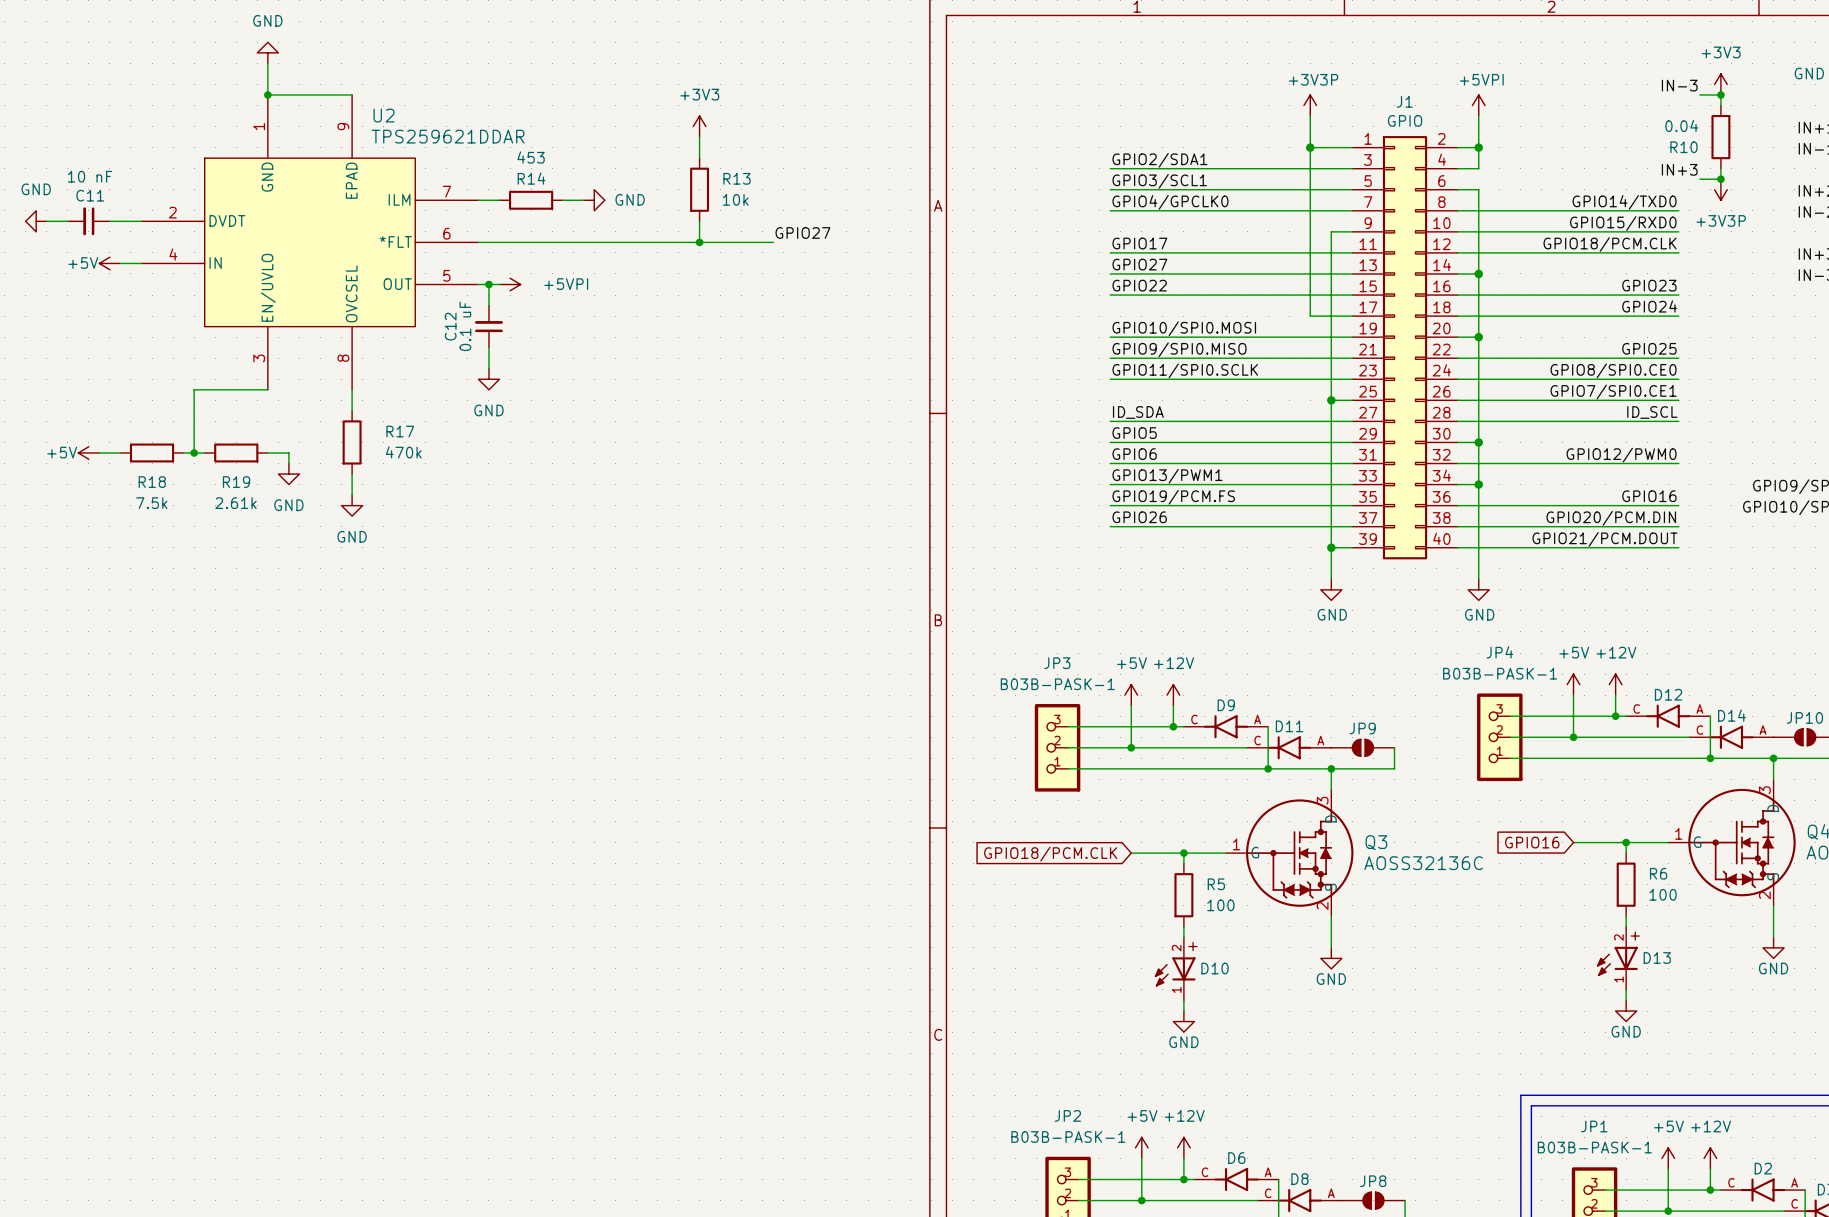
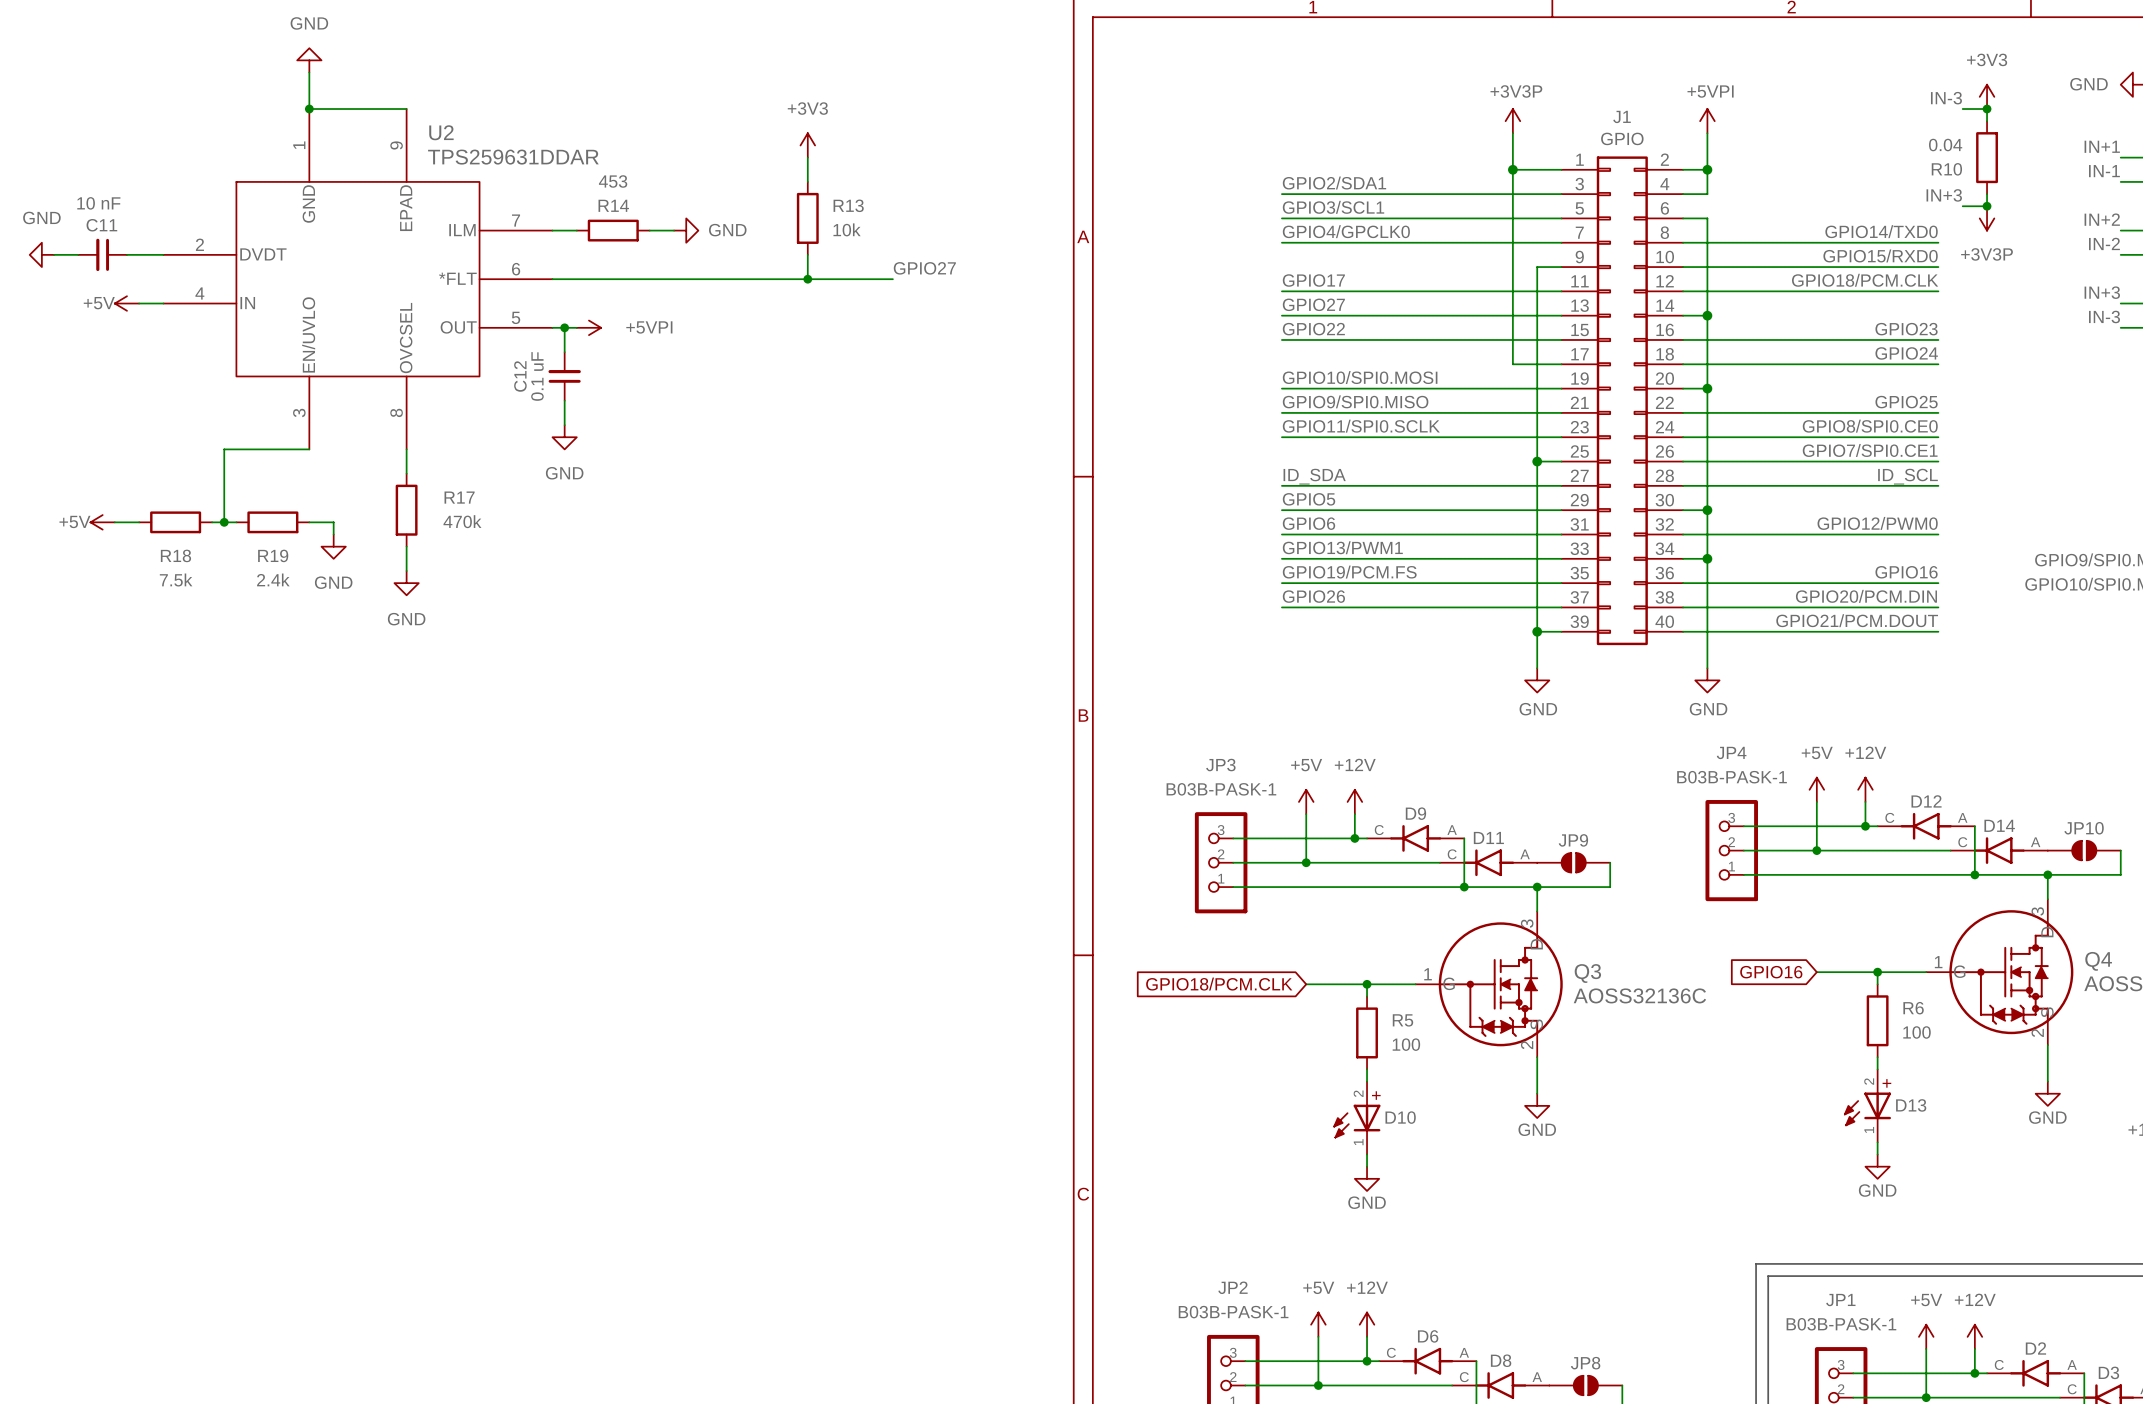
U2 value: TPS259621DDAR (448, 136) -> TPS259631DDAR (513, 157)
R19 value: 2.61k (236, 503) -> 2.4k (273, 579)

